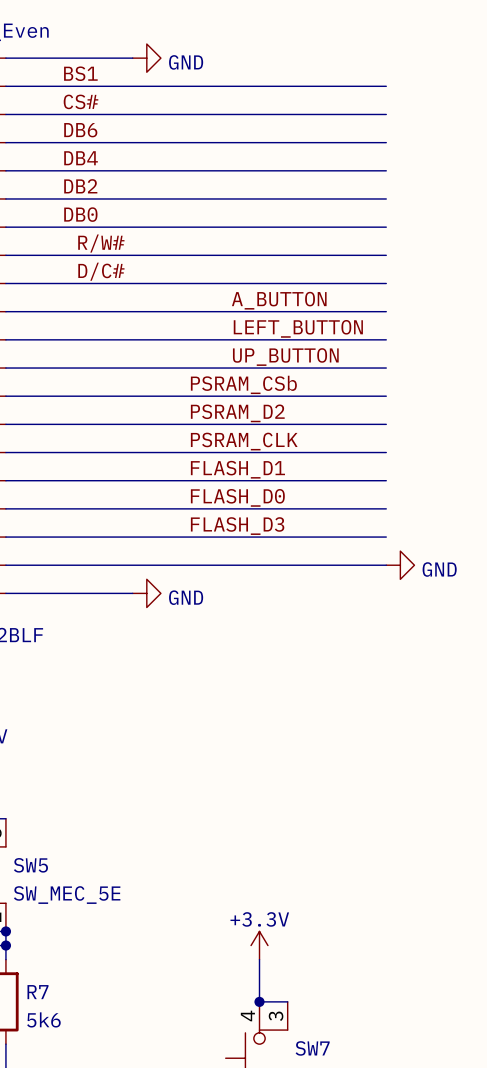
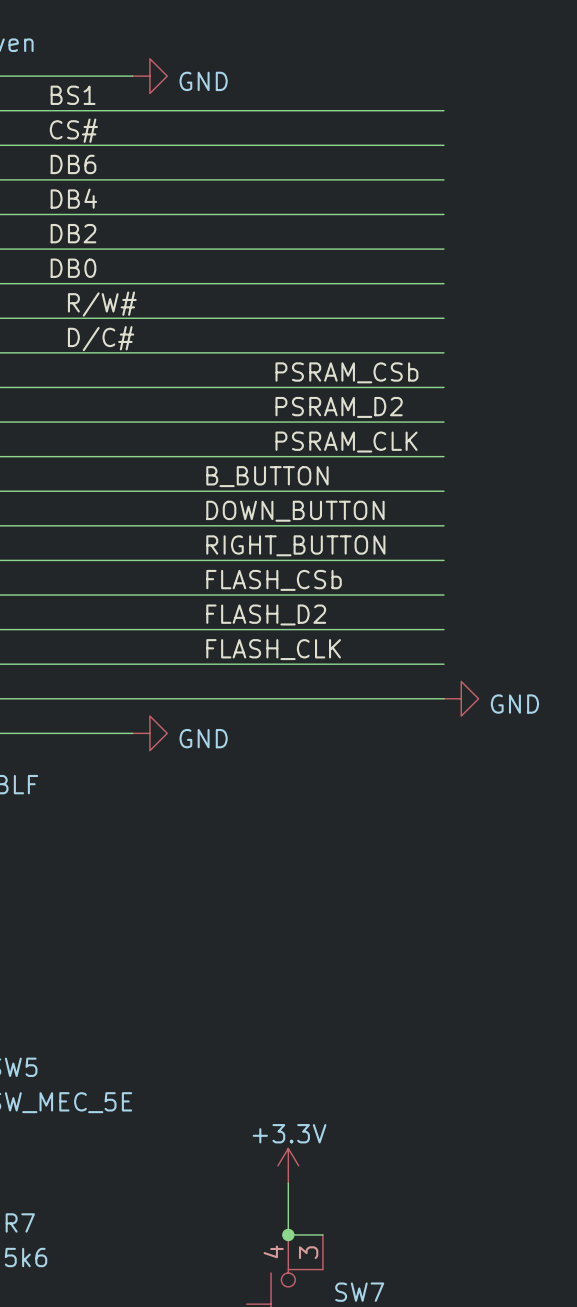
label: A_BUTTON (279, 300) -> none
label: none -> PSRAM_CSb (346, 372)
label: none -> PSRAM_D2 (339, 407)
label: LEFT_BUTTON (298, 328) -> none
label: UP_BUTTON (285, 357) -> none
label: none -> PSRAM_CLK (346, 442)
label: PSRAM_CSb (243, 384) -> B_BUTTON (267, 476)
label: PSRAM_D2 (237, 413) -> DOWN_BUTTON (295, 511)
label: PSRAM_CLK (244, 441) -> RIGHT_BUTTON (295, 545)
label: FLASH_D1 (237, 469) -> FLASH_CSb (274, 580)
label: FLASH_D0 (237, 497) -> FLASH_D2 (266, 614)
label: FLASH_D3 (237, 526) -> FLASH_CLK (273, 649)

